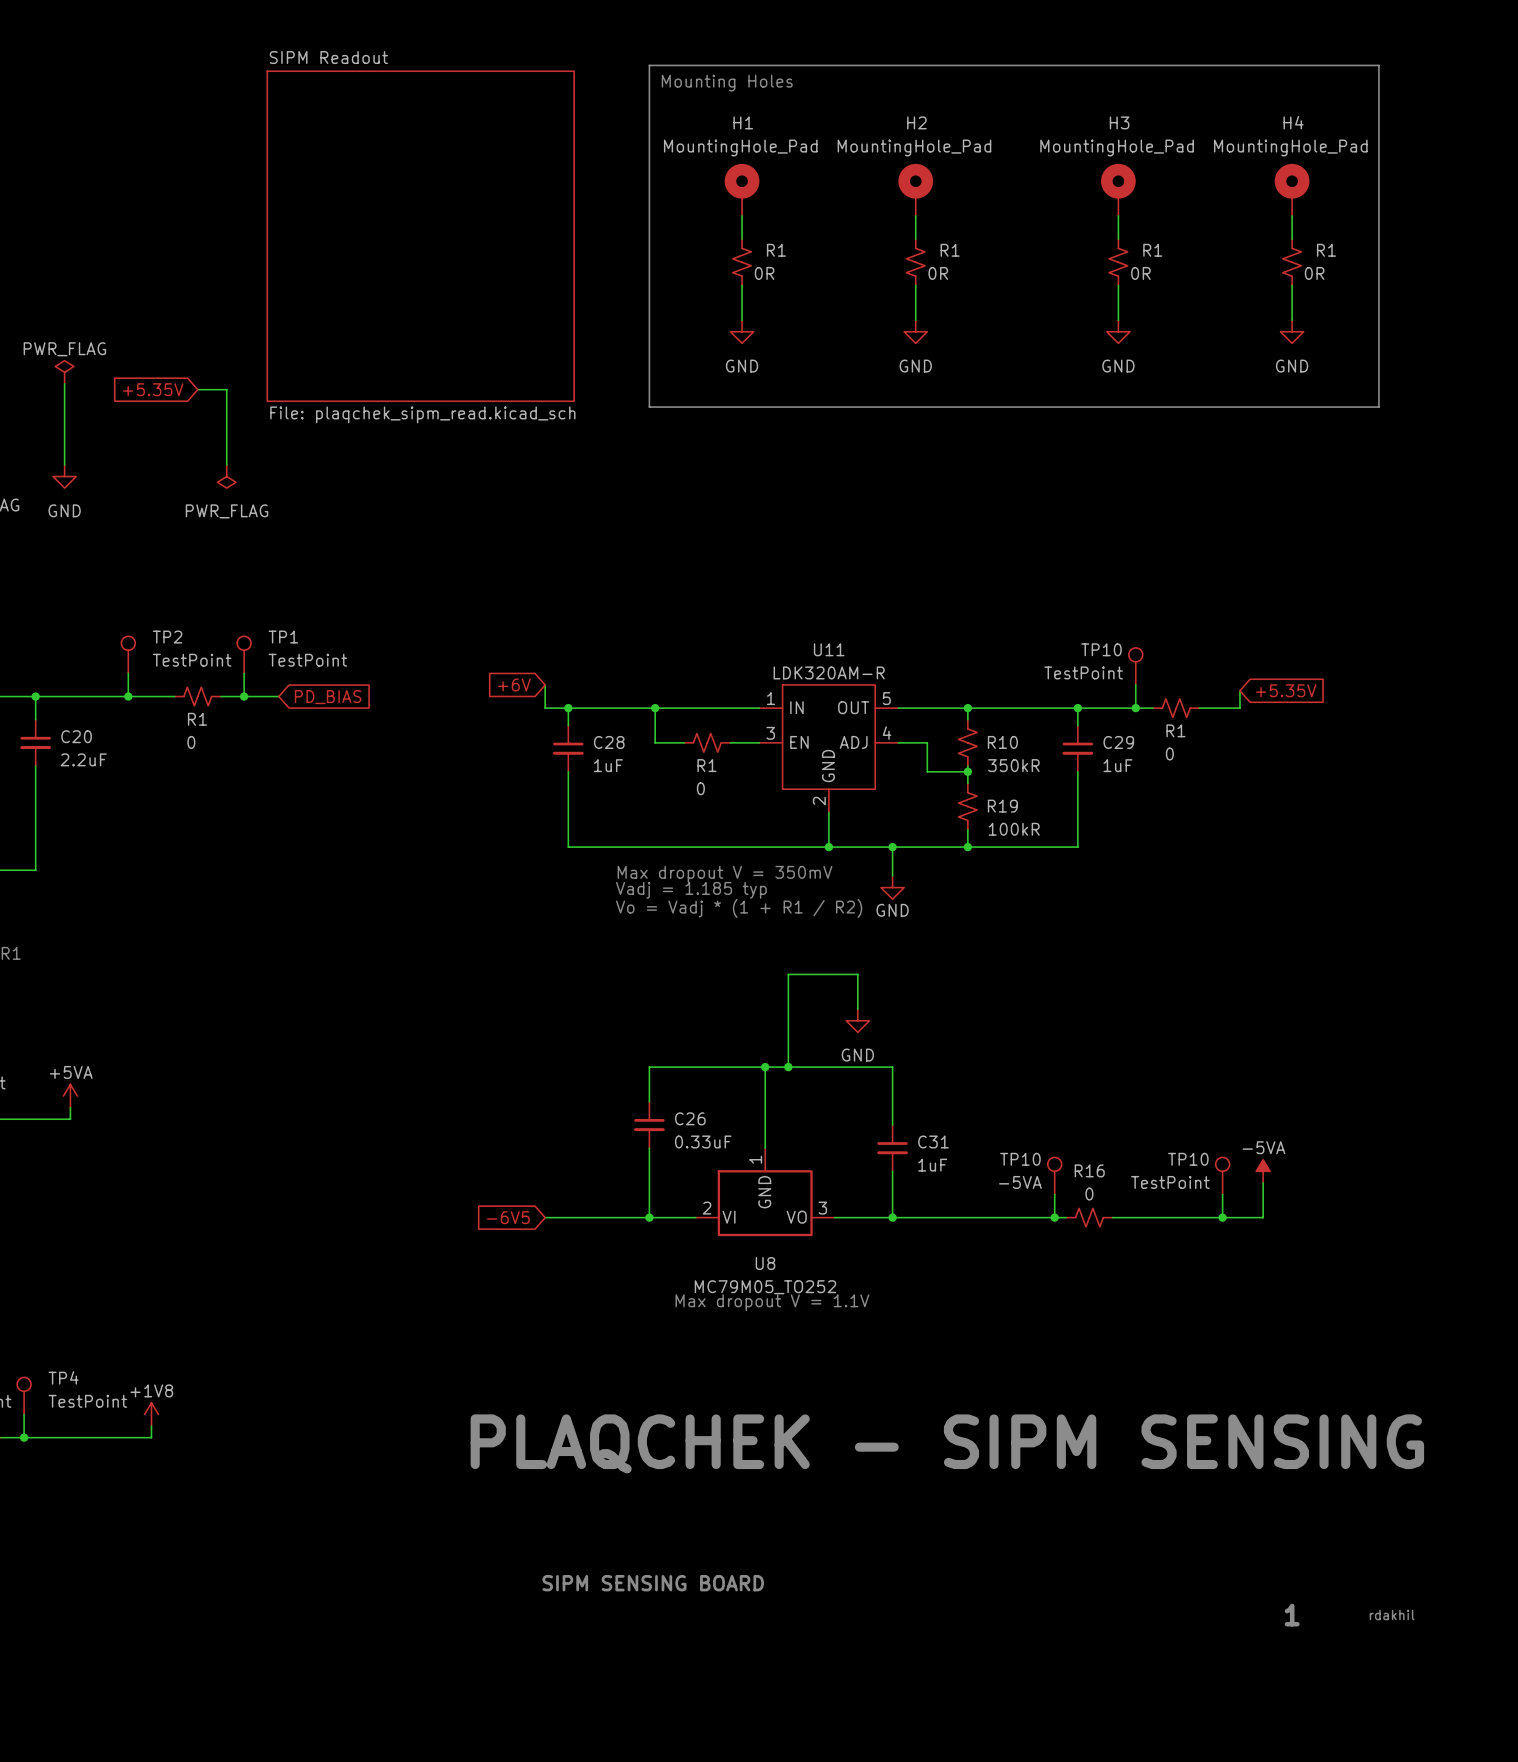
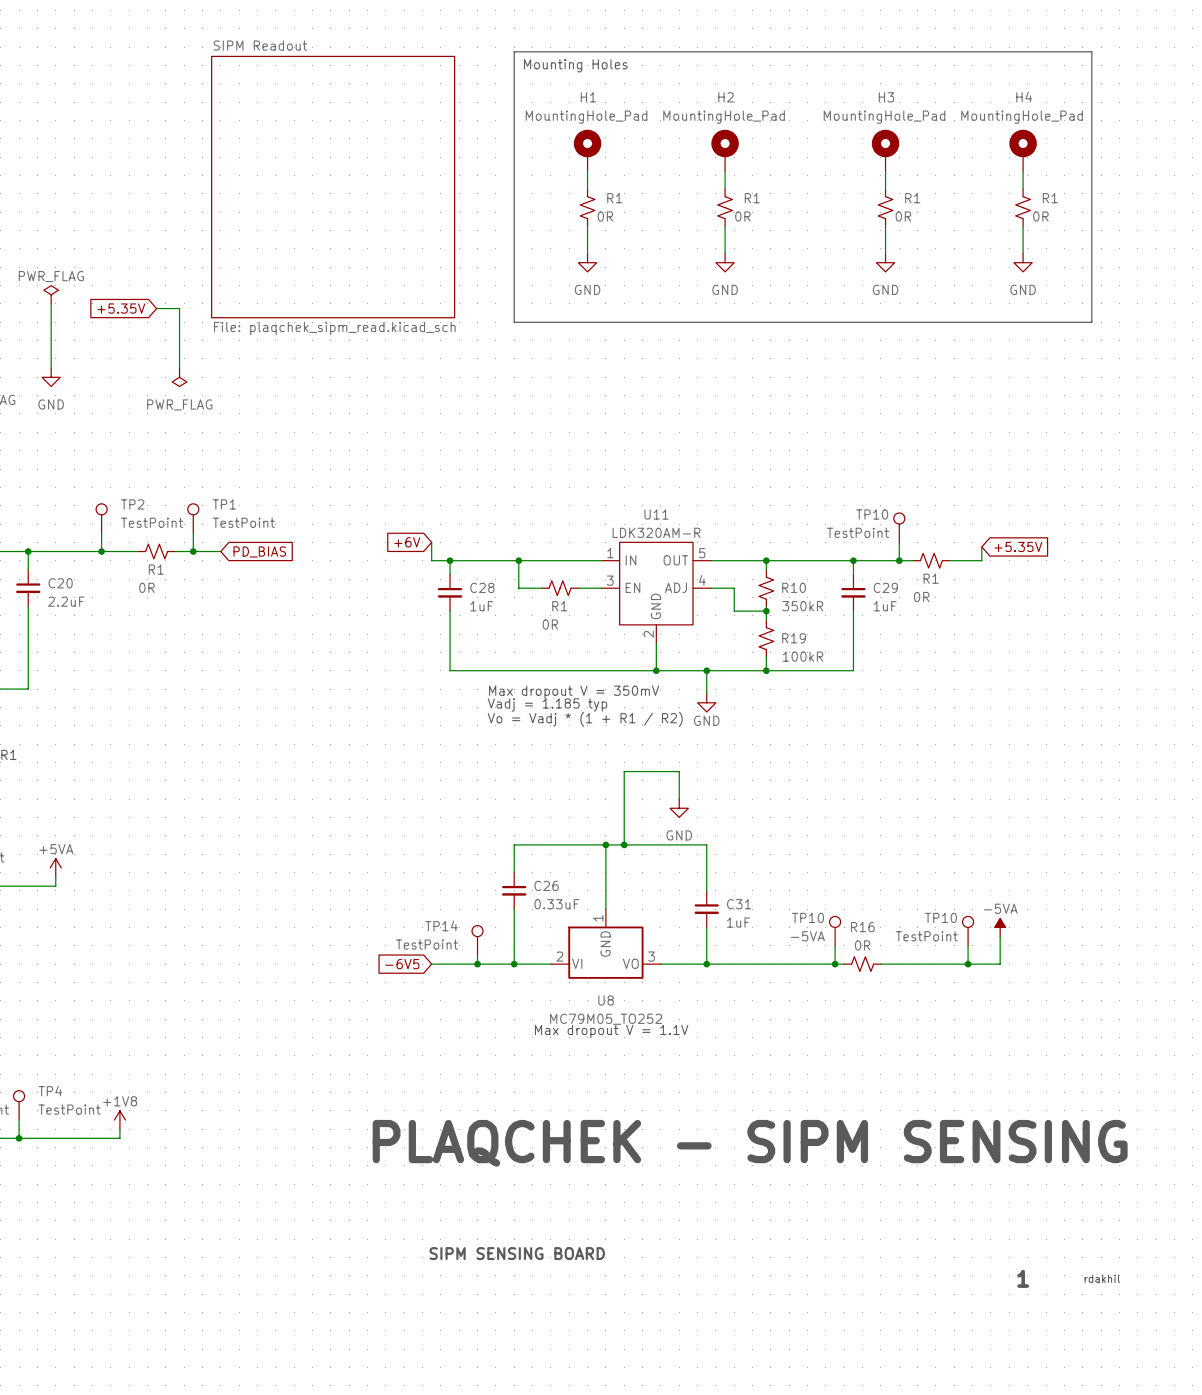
R1 value: 0 (191, 742) -> 0R (146, 587)
R1 value: 0 (1169, 754) -> 0R (921, 597)
R1 value: 0 (700, 788) -> 0R (550, 624)
TP14: none -> TestPoint (477, 940)
R16 value: 0 (1089, 1194) -> 0R (862, 945)
wire: none -> (477, 954) (477, 964)
junction: none -> (477, 964)

